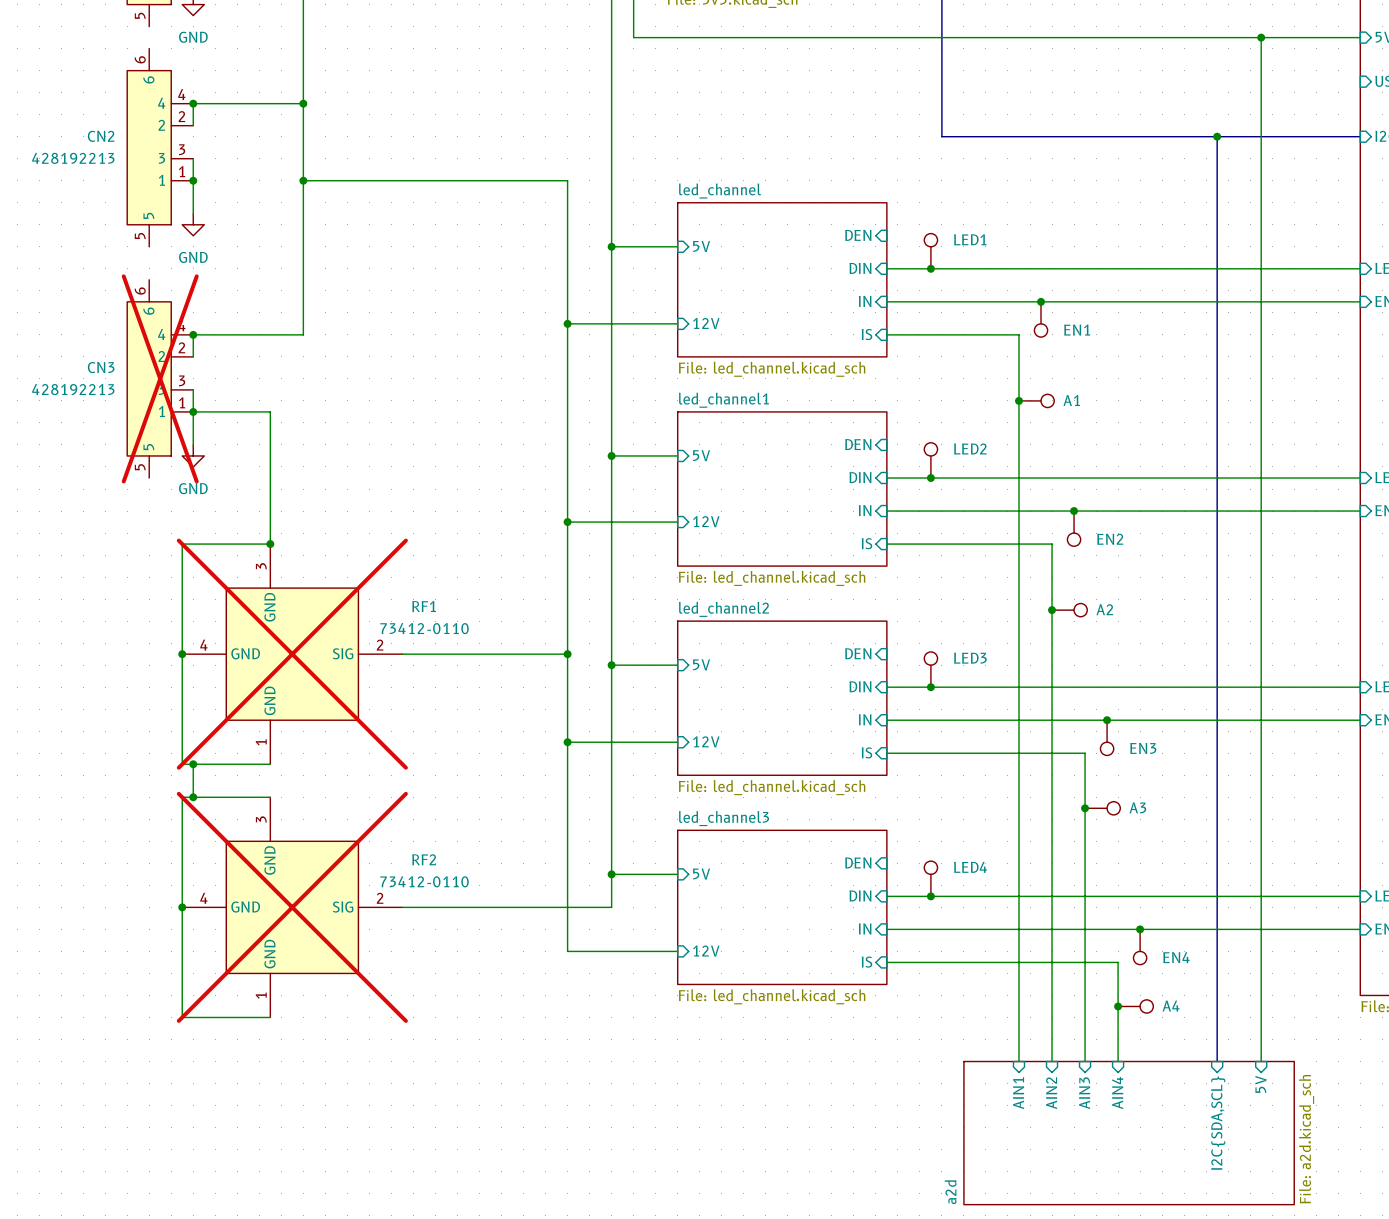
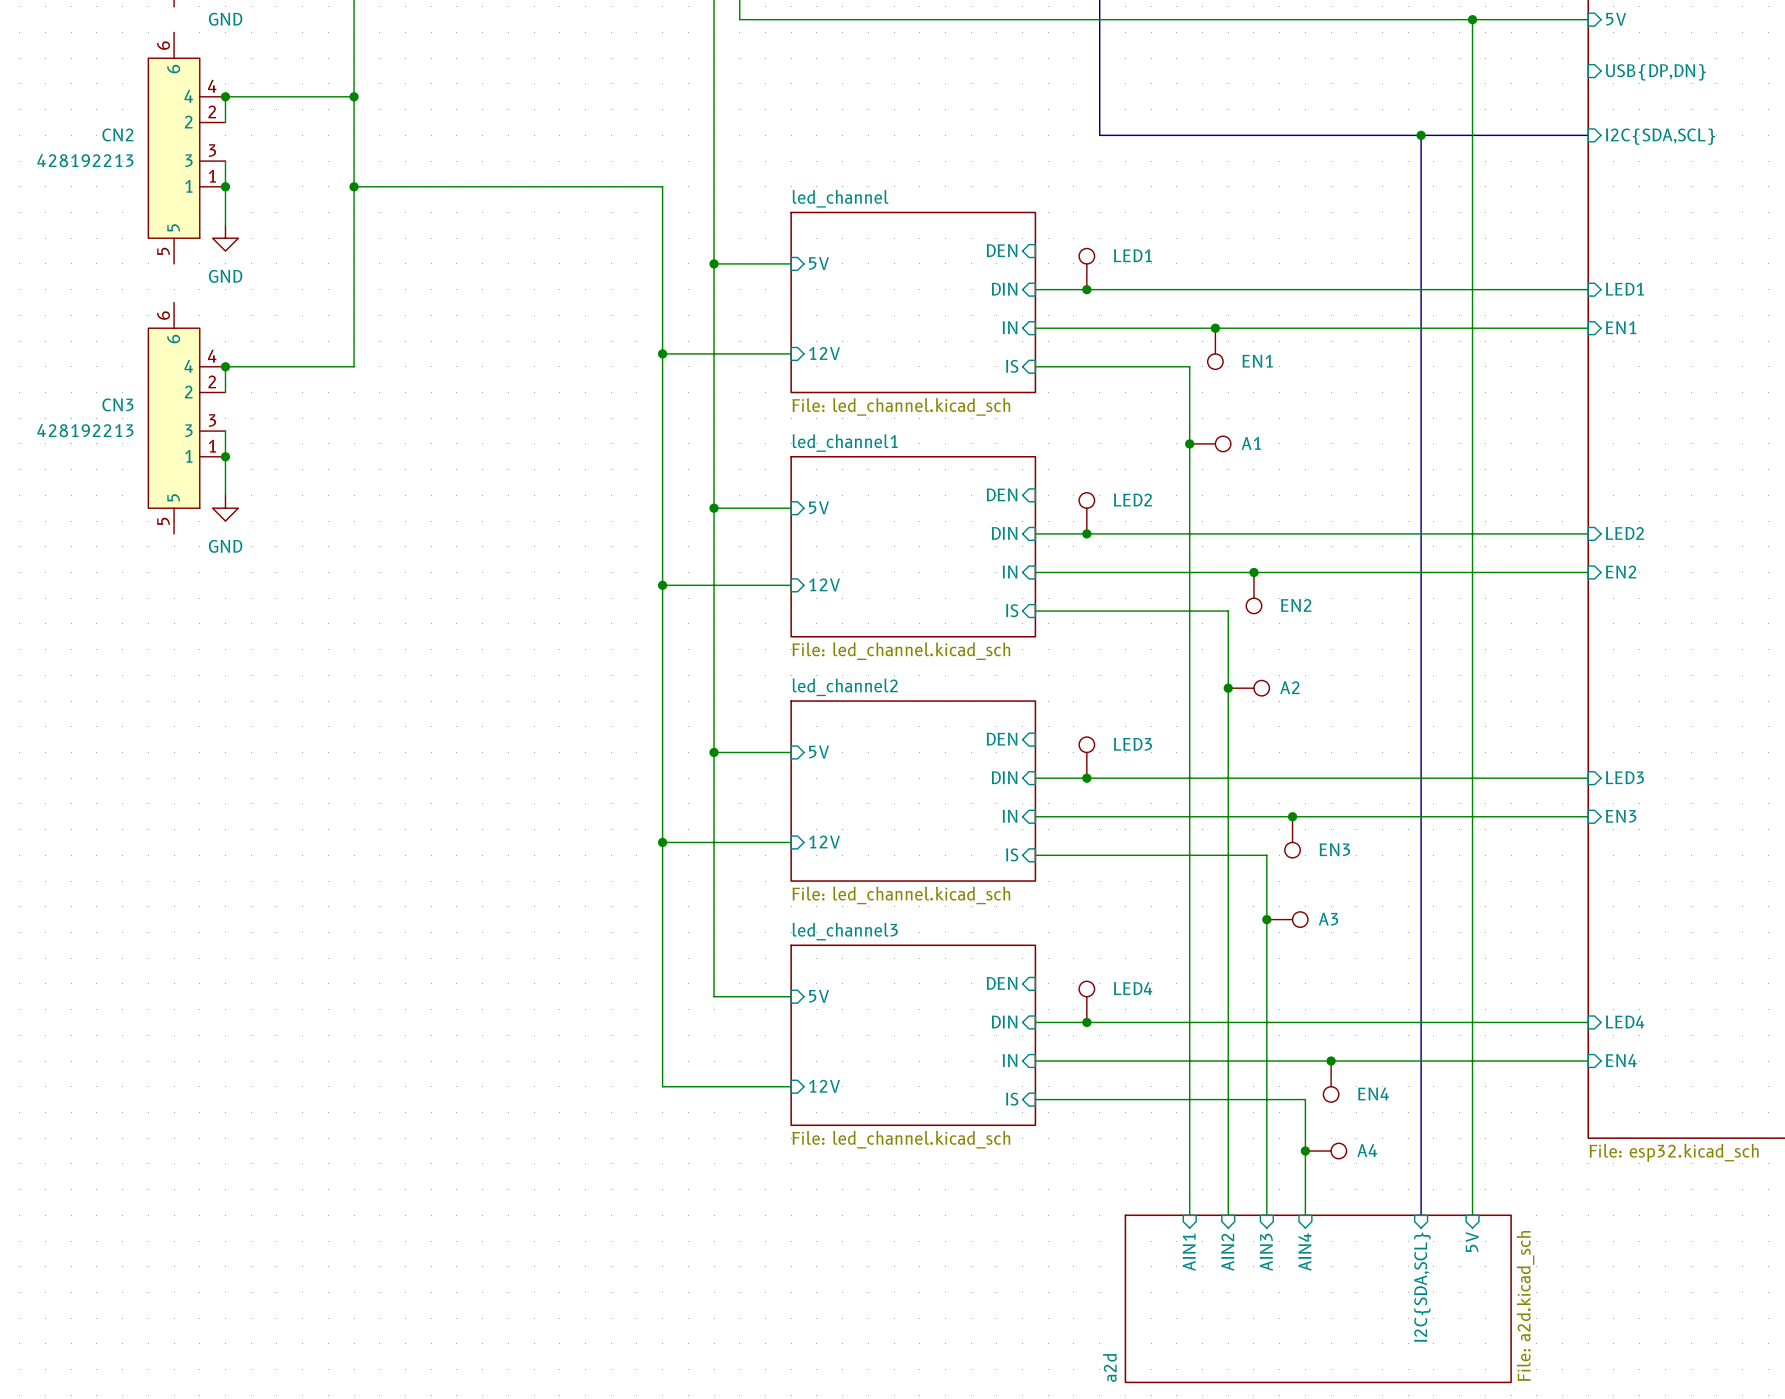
CN3 do-not-place cross: (160, 378) -> none
wire: (193, 411) (270, 411) (270, 544) (182, 544) (182, 764) (270, 764) -> none
junction: (270, 544) -> none
junction: (182, 654) -> none
RF1: 73412-0110 (292, 654) -> none
wire: (402, 654) (567, 654) -> none
junction: (567, 654) -> none
wire: (193, 764) (193, 797) -> none
junction: (193, 764) -> none
junction: (193, 797) -> none
wire: (270, 797) (182, 797) (182, 1017) (270, 1017) -> none
wire: (611, 874) (611, 907) (402, 907) -> none
junction: (611, 874) -> none
junction: (182, 907) -> none
RF2: 73412-0110 (292, 907) -> none

